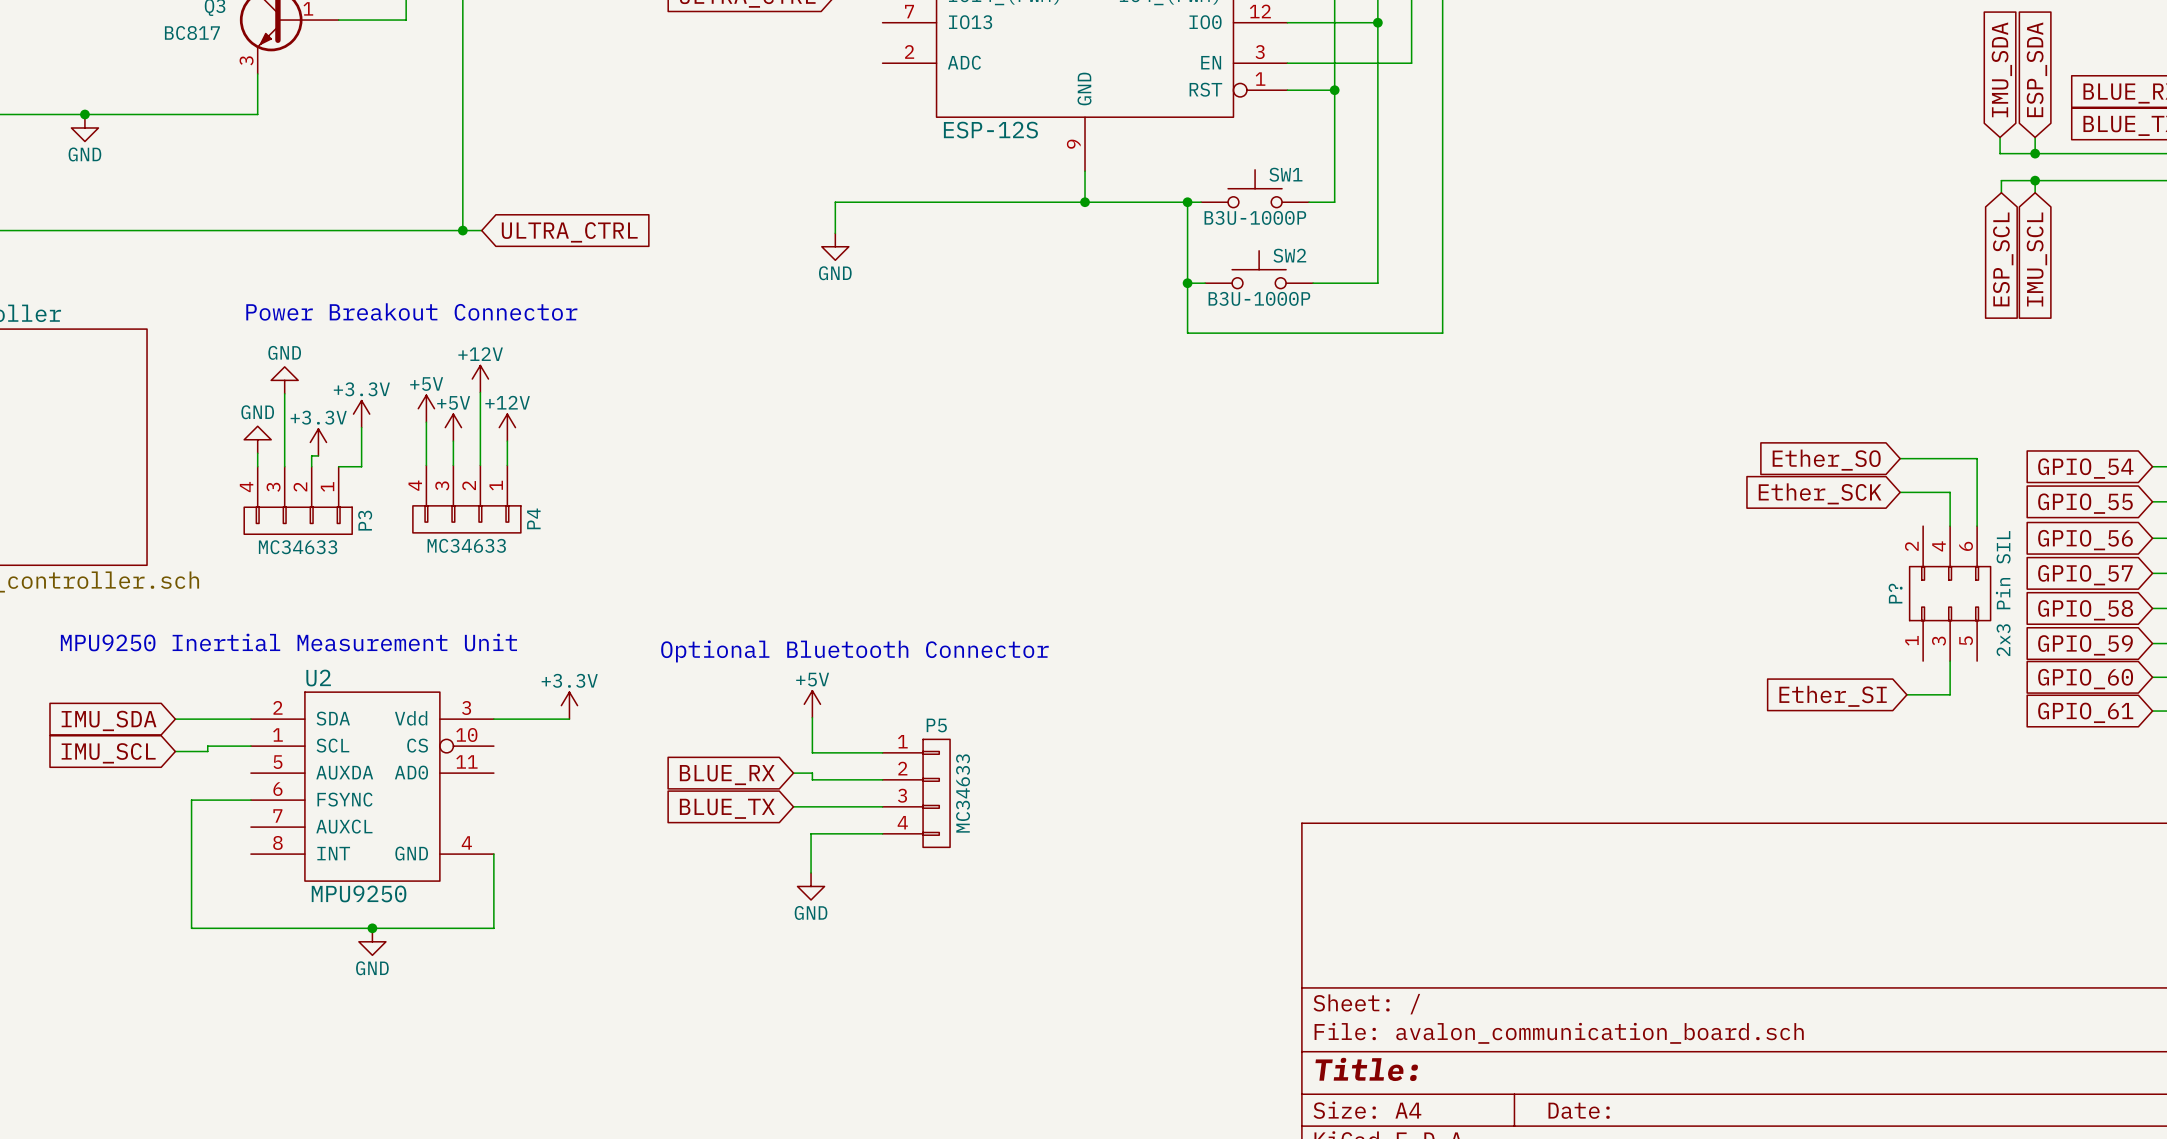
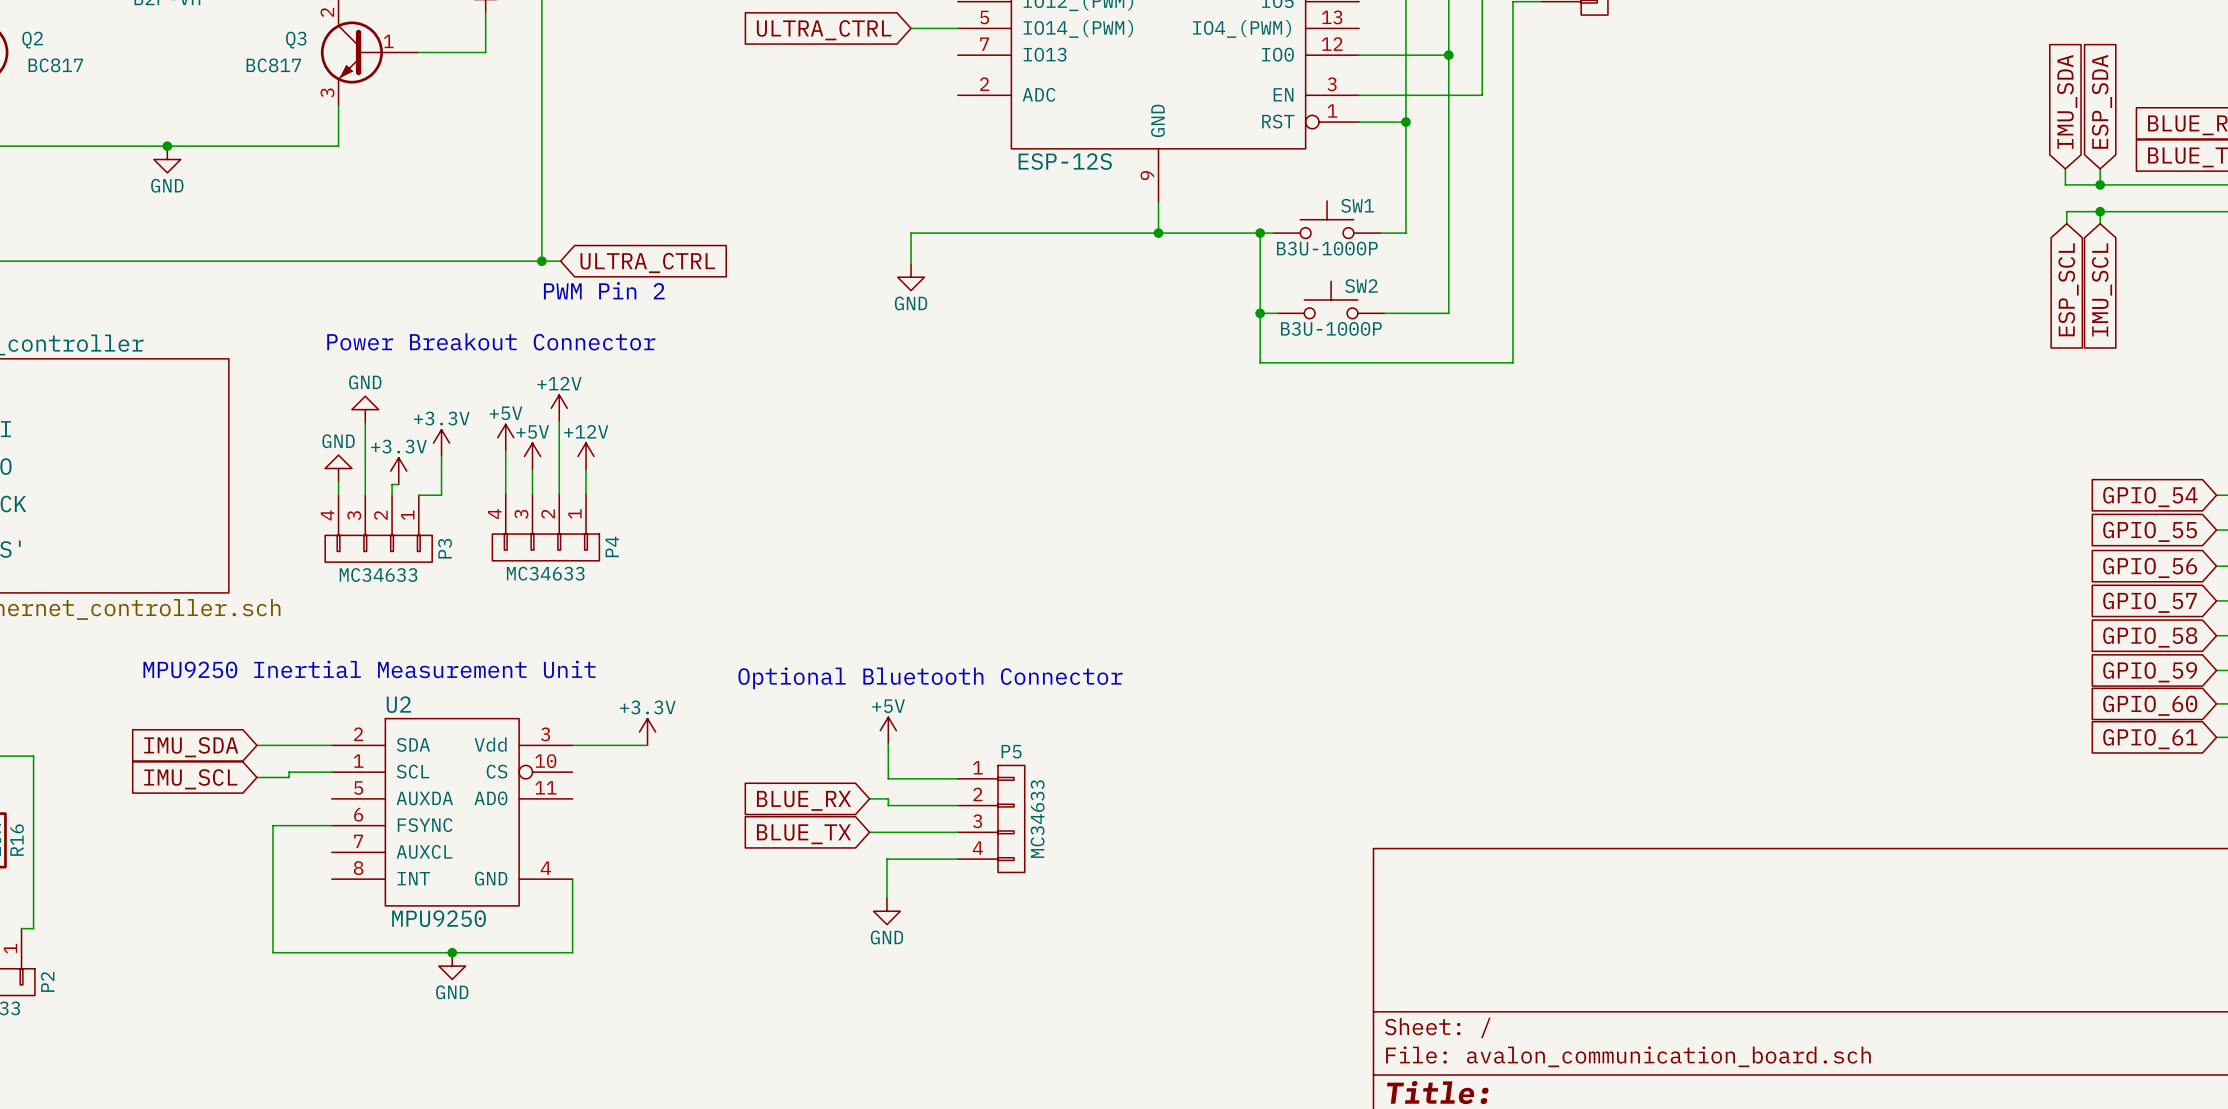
text: none -> PWM Pin 2 (604, 290)
wire: (1900, 458) (1977, 458) (1977, 526) -> none
global label: Ether_SO (1826, 460) -> none
wire: (1900, 492) (1950, 492) (1950, 526) -> none
global label: Ether_SCK (1820, 493) -> none
P?: 2x3 Pin SIL (1950, 593) -> none
wire: (1950, 661) (1950, 694) (1906, 694) -> none
global label: Ether_SI (1833, 696) -> none

